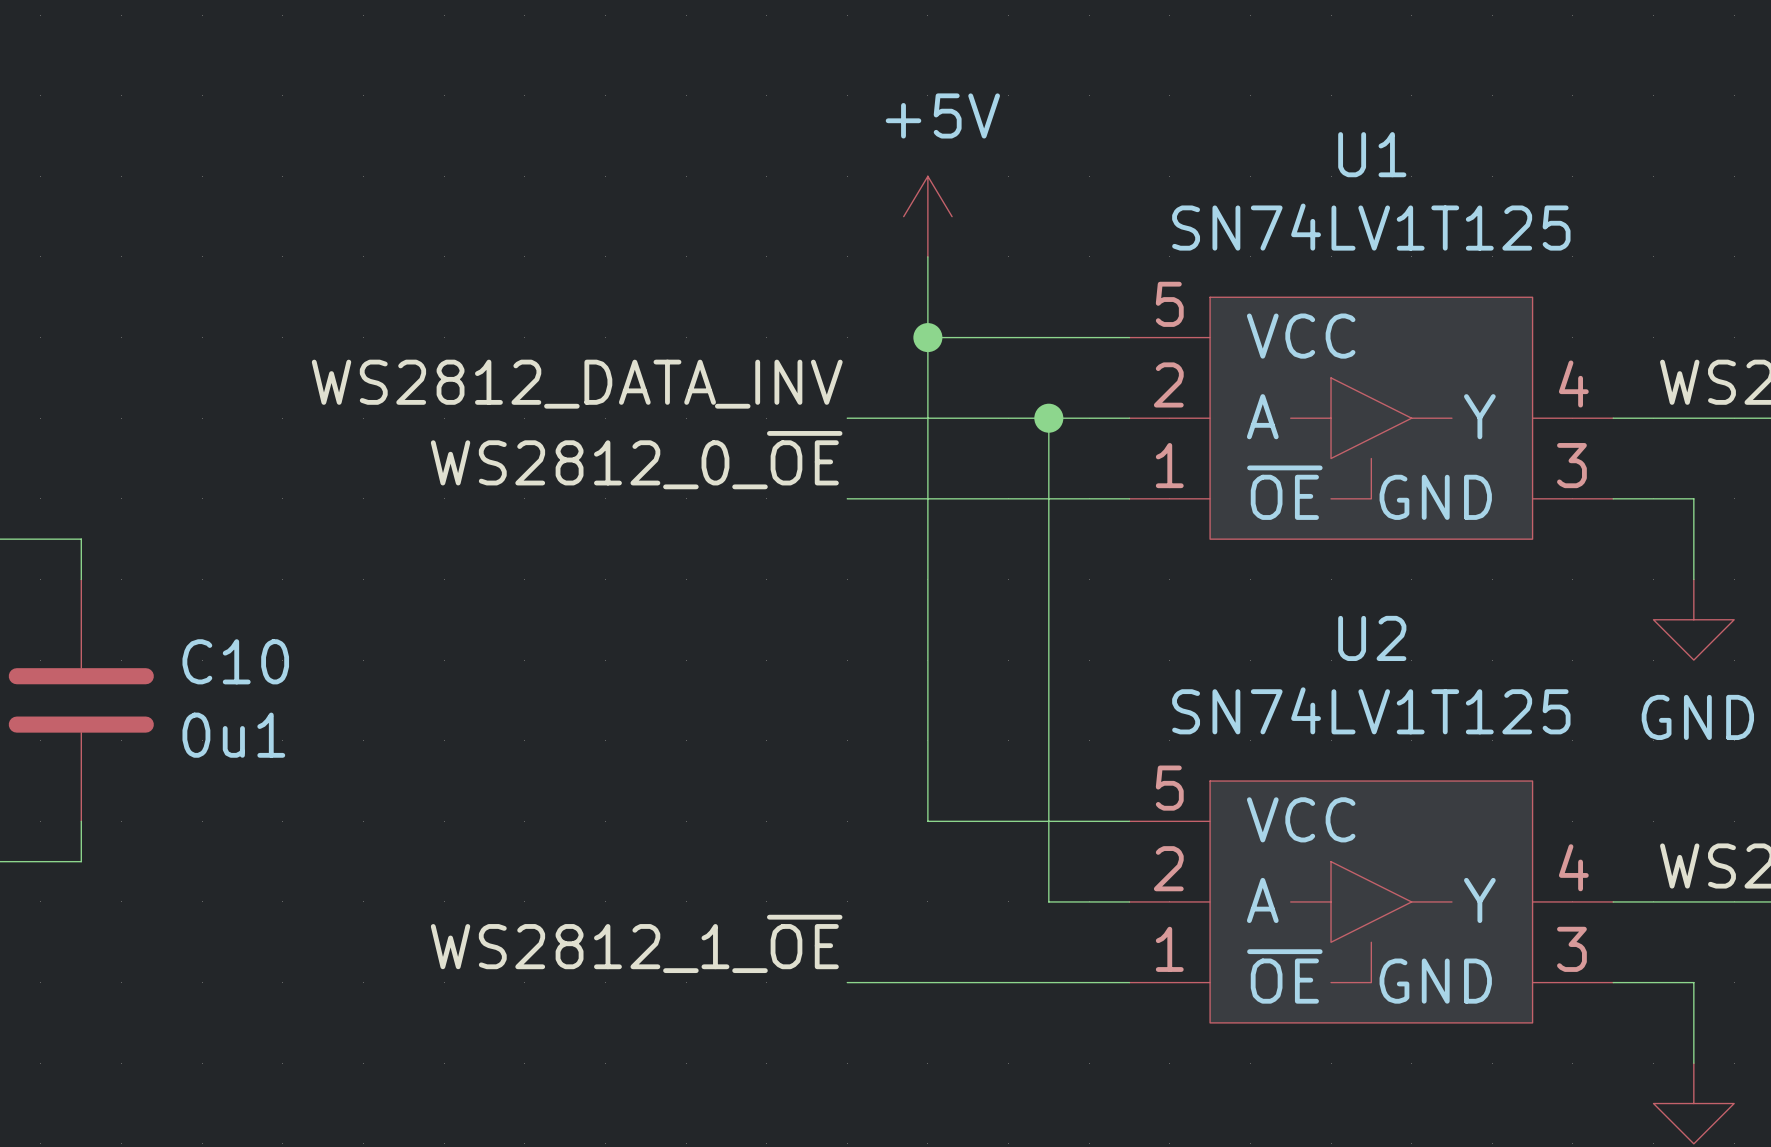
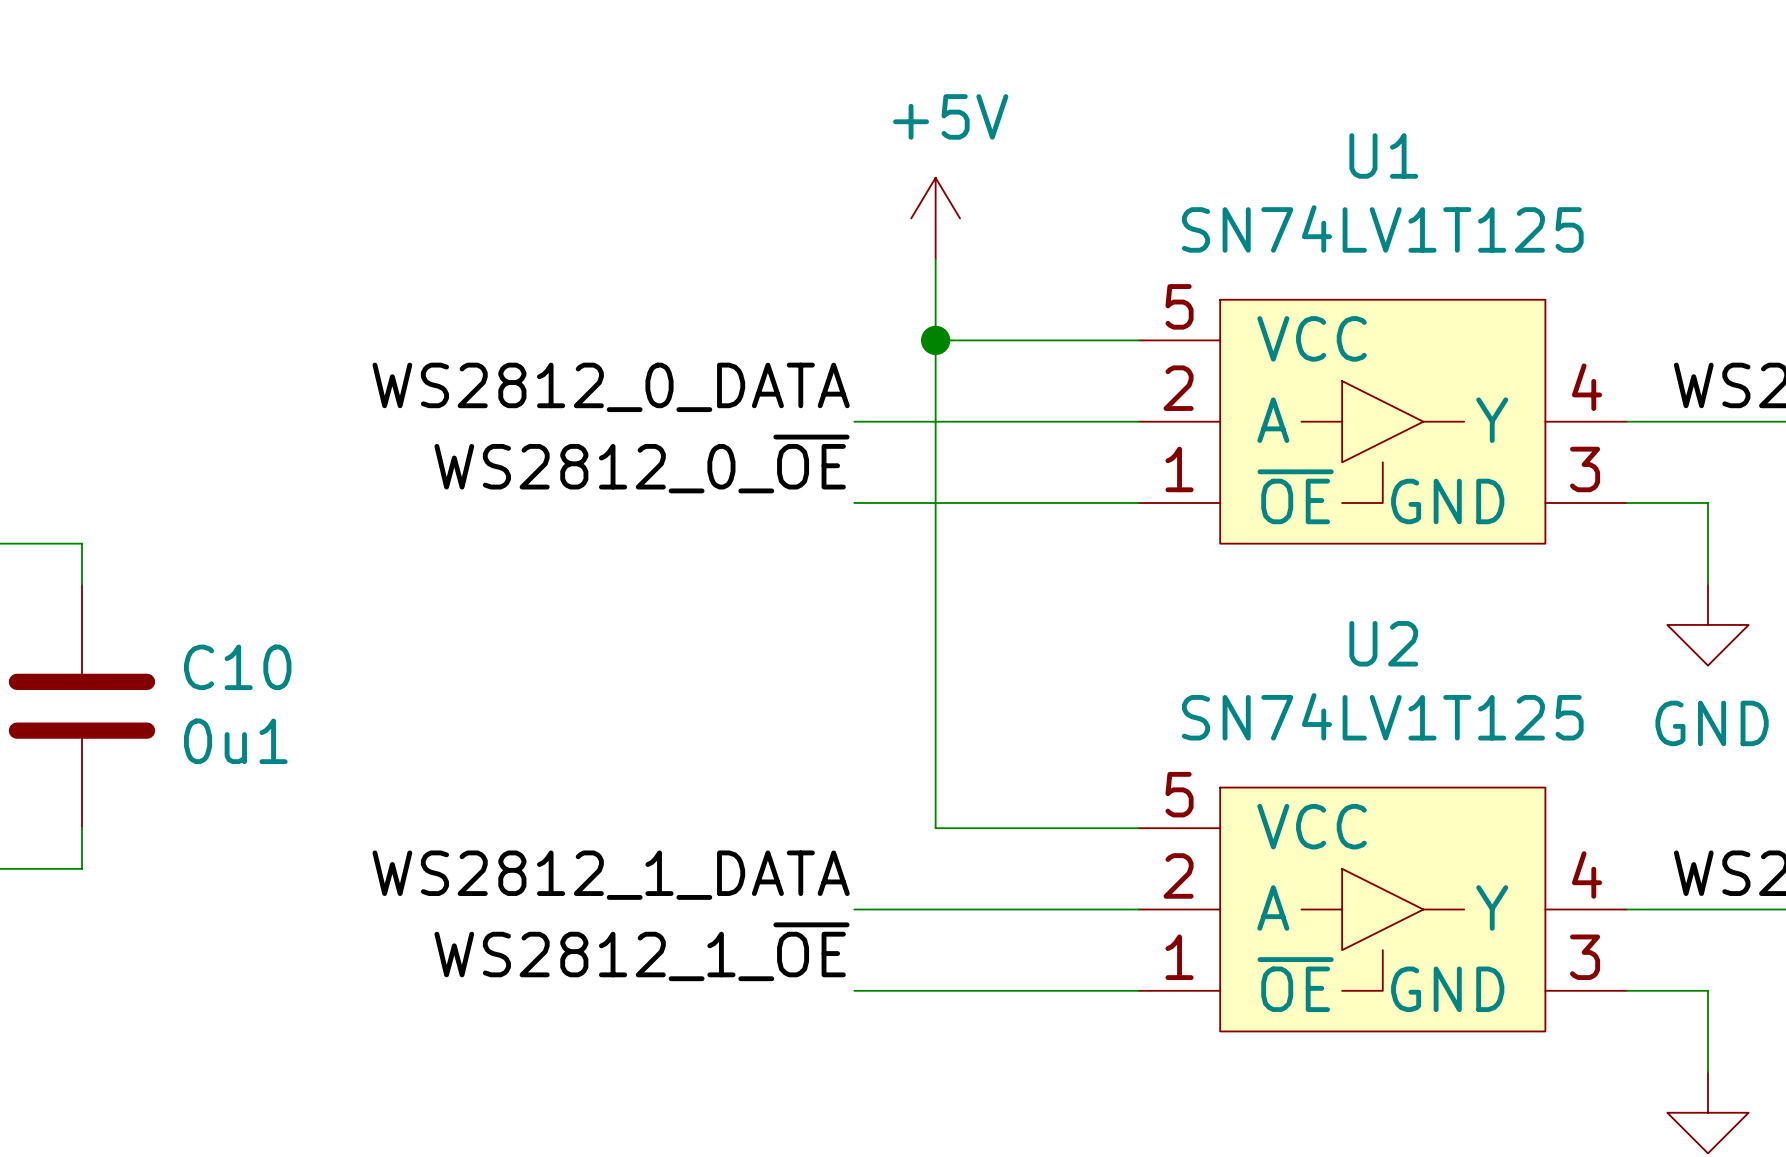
label: WS2812_DATA_INV (577, 384) -> WS2812_0_DATA (611, 387)
wire: (1048, 418) (1048, 901) -> (854, 909) (1057, 909)
junction: (1048, 418) -> none
label: none -> WS2812_1_DATA (611, 875)

